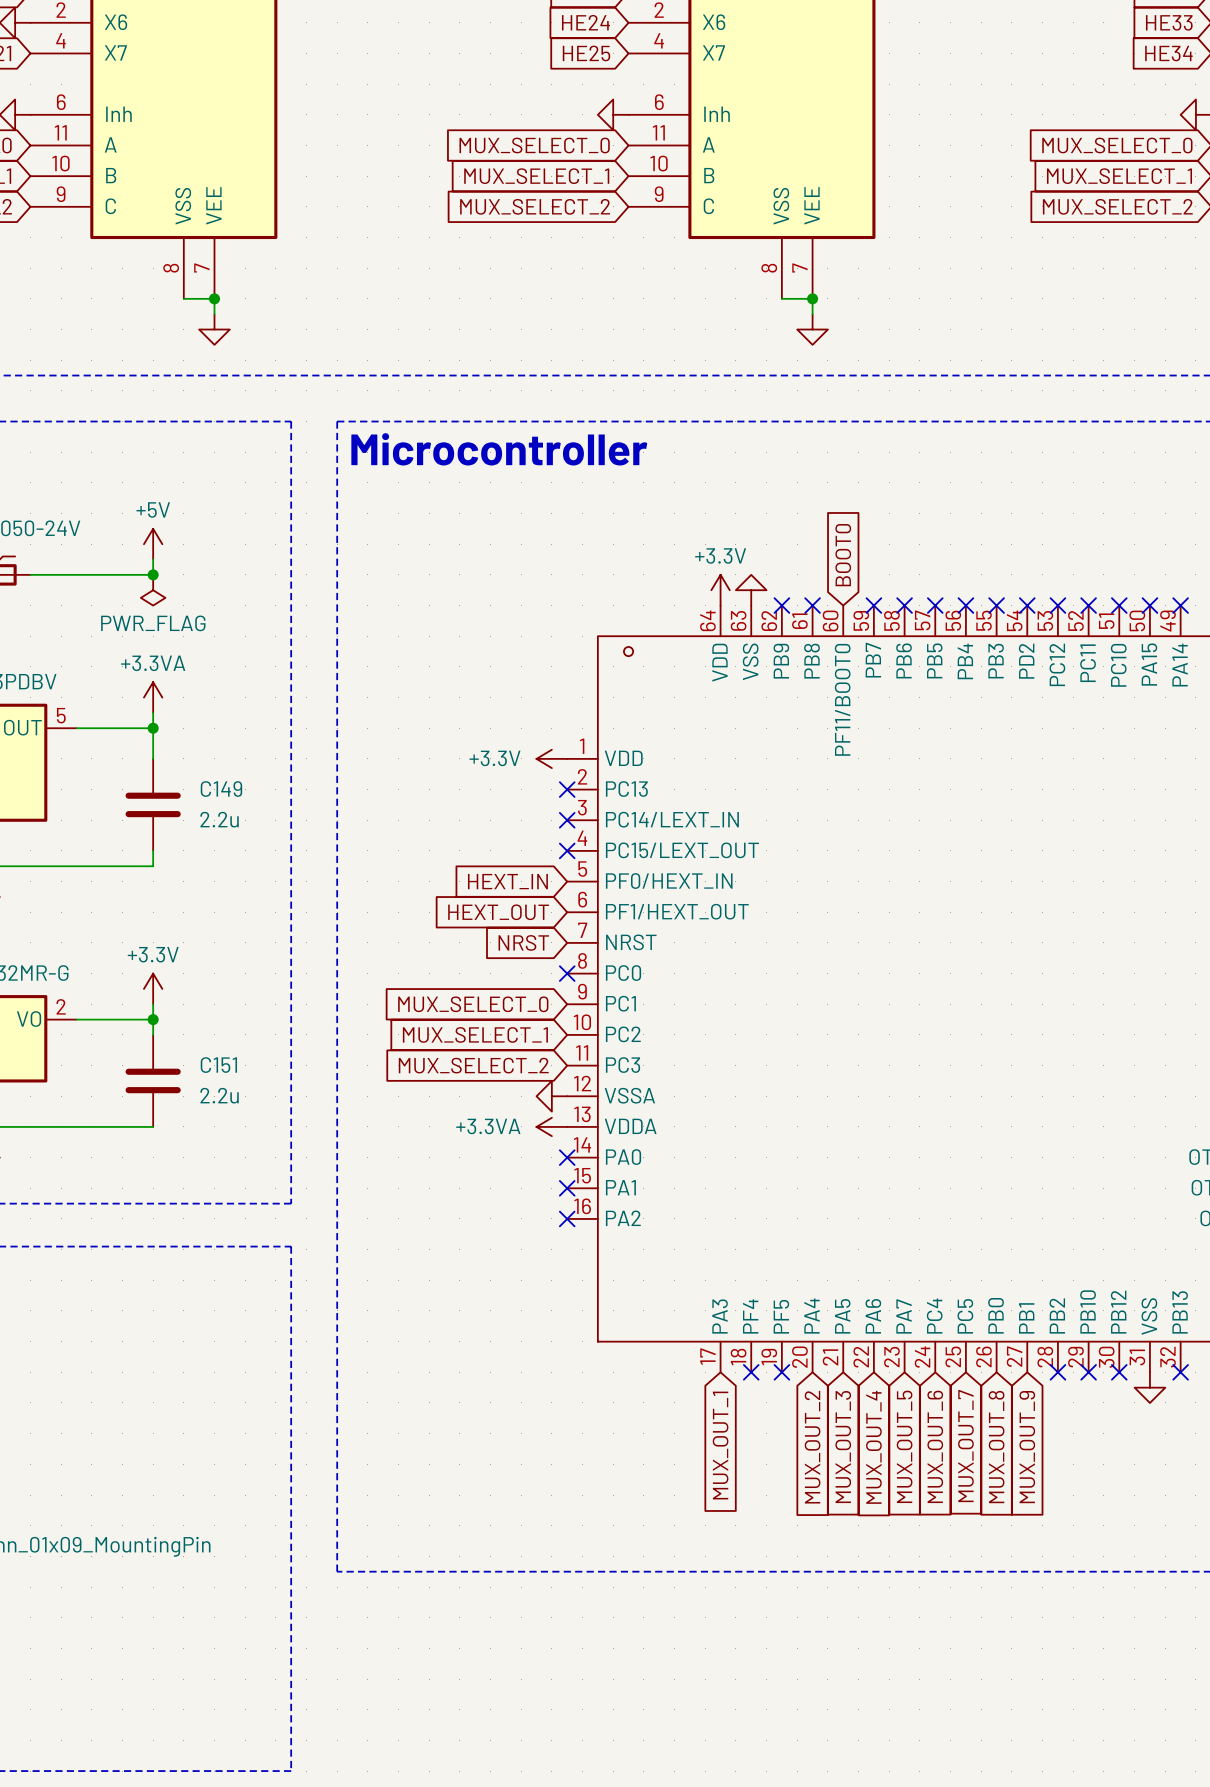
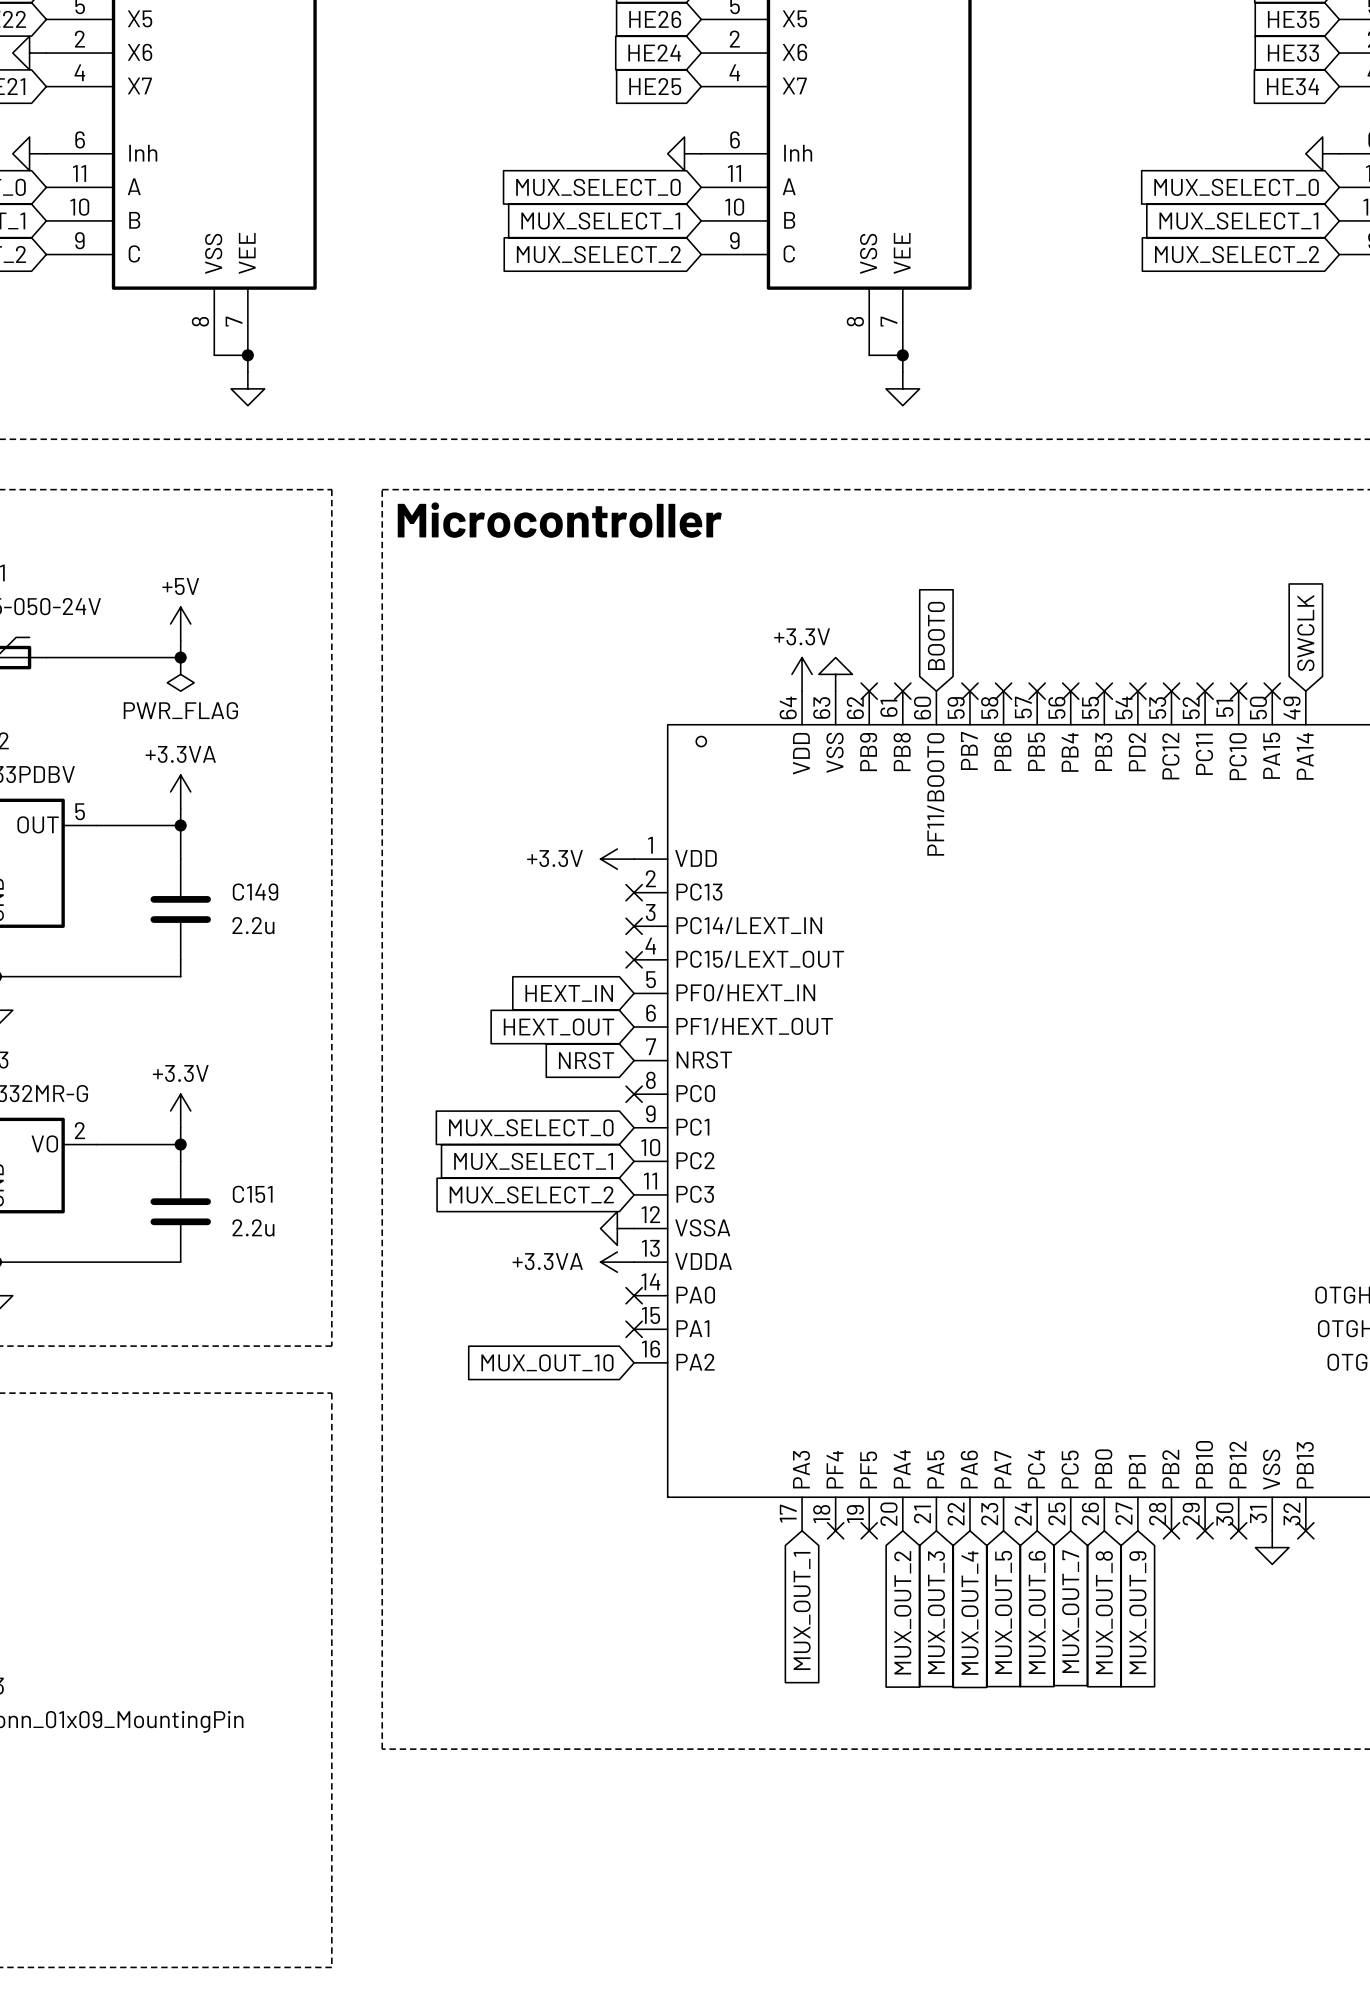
global label: none -> SWCLK (1305, 633)
no-connect mark: (1180, 605) -> none
global label: none -> MUX_OUT_10 (547, 1362)
no-connect mark: (567, 1218) -> none

